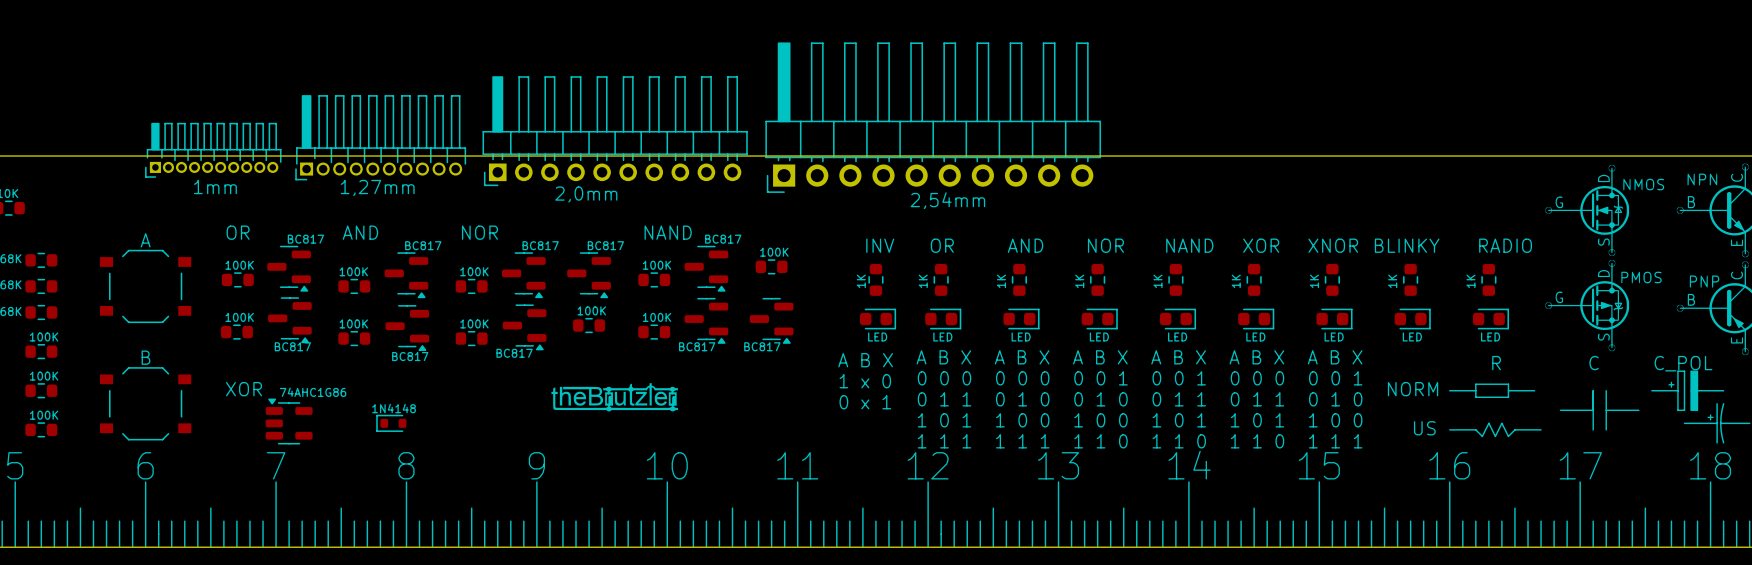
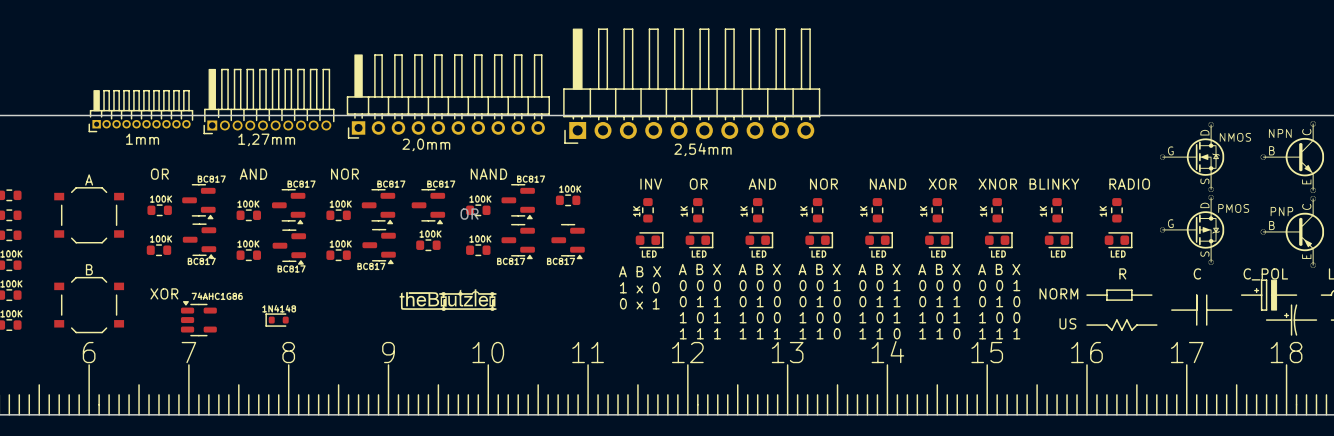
text: none -> OR (469, 214)

